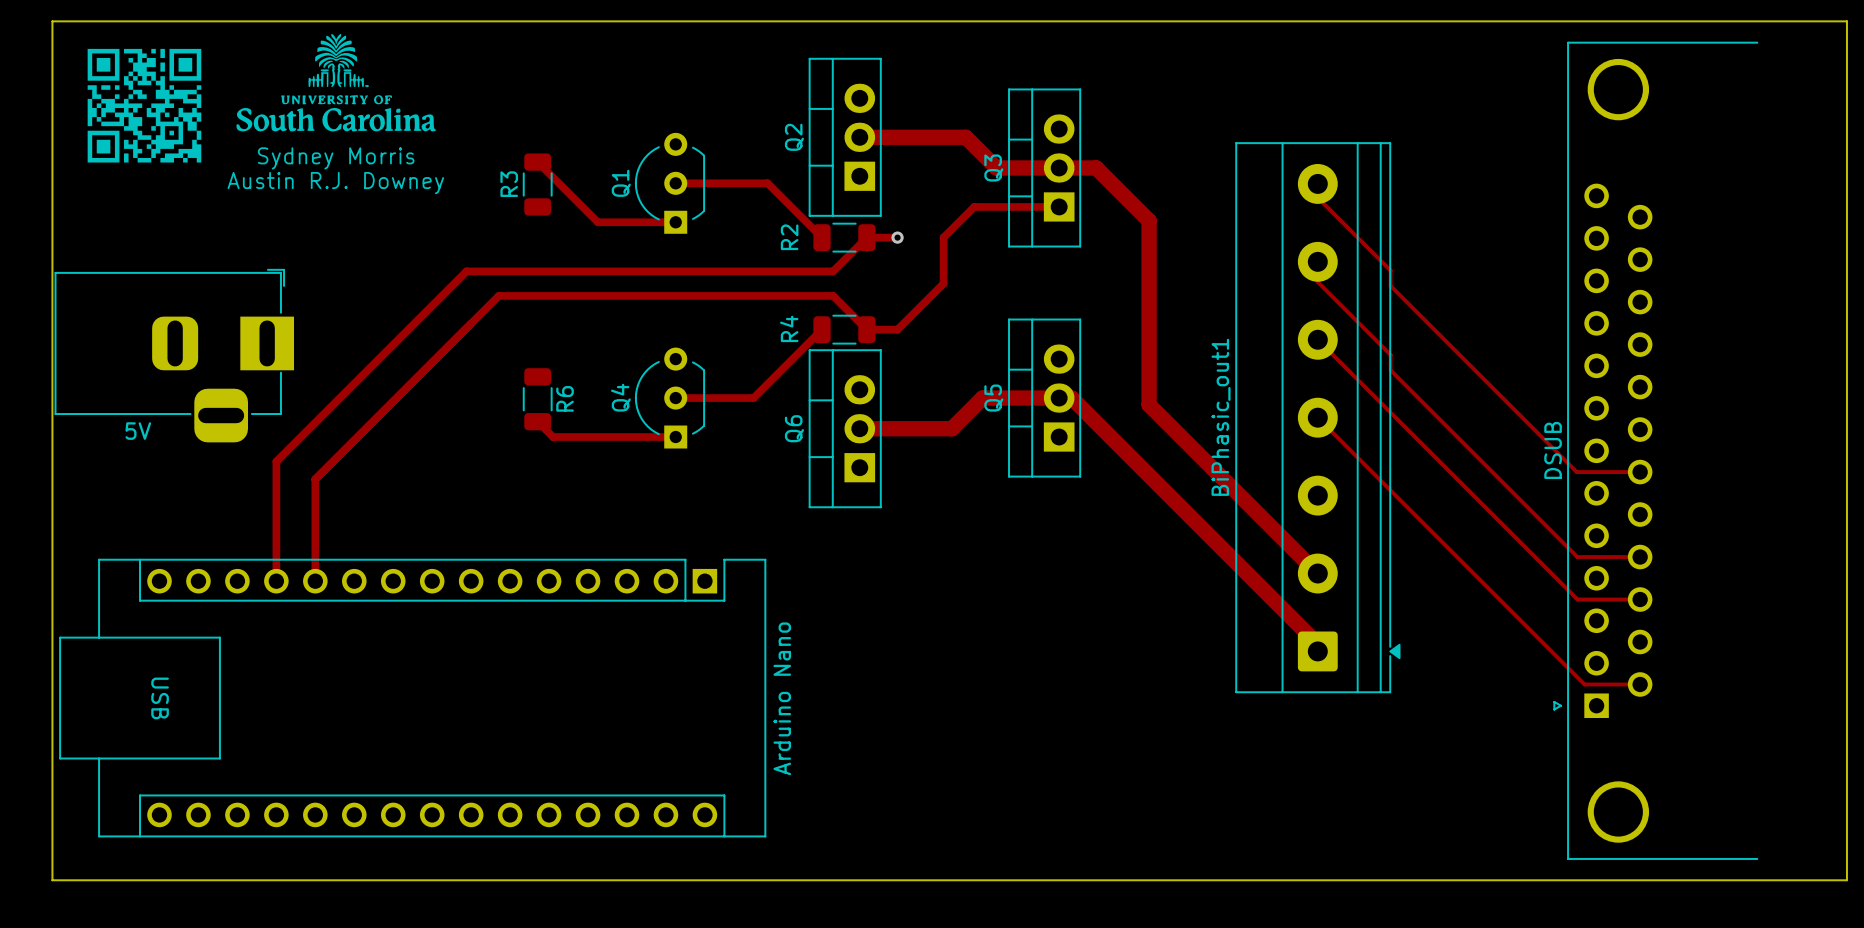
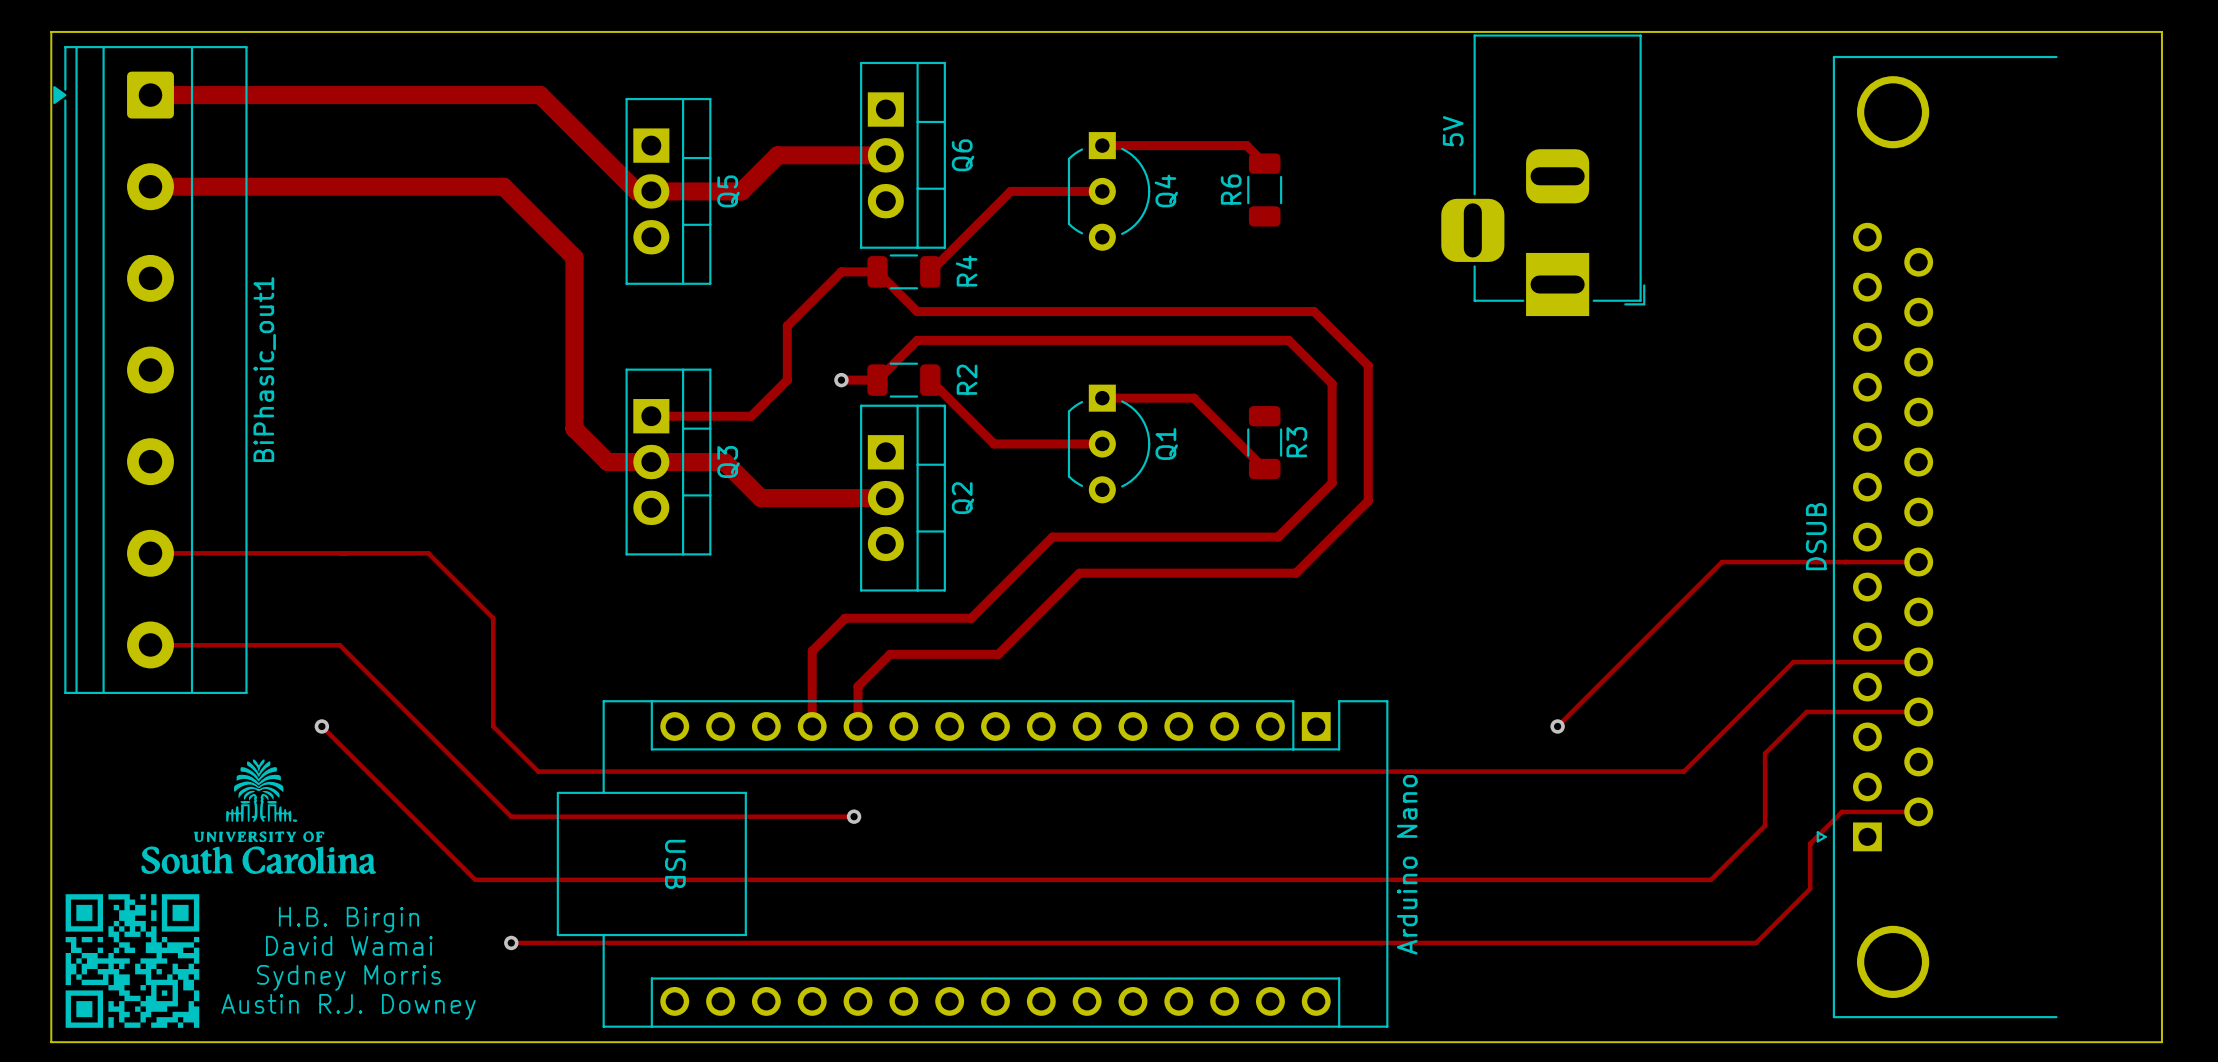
drawing: [236, 33, 436, 132] -> none
drawing: [87, 48, 202, 163] -> none
track: none -> (150, 95) (540, 95) (636, 191) (741, 191) (777, 155) (885, 155)
track: none -> (1102, 145) (1246, 145) (1264, 163)
Q2 rotation: 0° (845, 137) -> 180° (902, 498)
Q2 position: (845, 137) -> (902, 498)
track: (859, 137) (965, 137) (996, 167) (1096, 167) (1149, 220) (1149, 404) (1317, 573) -> none
track: none -> (150, 186) (503, 186) (574, 257) (574, 428) (607, 462) (724, 462) (760, 498) (885, 498)
track: none -> (1102, 191) (1010, 191) (930, 271)
text: Sydney Morris (336, 158) -> none
track: (537, 162) (597, 222) (675, 222) -> none
Q3 rotation: 0° (1044, 167) -> 180° (668, 462)
Q3 position: (1044, 167) -> (668, 462)
text: Austin R.J. Downey (335, 183) -> none
Q1 rotation: 0° (669, 183) -> 180° (1109, 443)
Q1 position: (669, 183) -> (1109, 443)
track: (675, 183) (767, 183) (822, 237) -> none
track: (1317, 183) (1317, 197) (1390, 270) (1390, 285) (1576, 472) -> (1557, 726) (1722, 562) (1844, 562)
R3 name position: R3 (509, 184) -> R3 (1296, 442)
R3 position: (537, 184) -> (1264, 442)
track: (1059, 206) (974, 206) (943, 237) (943, 283) (897, 329) (866, 329) (833, 295) (498, 295) (315, 479) (315, 581) -> none
R2 name position: R2 (789, 237) -> R2 (967, 379)
R2 position: (844, 237) -> (903, 380)
track: (897, 237) (866, 237) (833, 271) (466, 271) (276, 461) (276, 581) -> none
via: (897, 237) -> none
track: (1317, 261) (1317, 282) (1390, 354) (1390, 370) (1577, 557) -> (150, 553) (428, 553) (493, 618) (493, 726) (538, 771) (1683, 771) (1793, 661) (1844, 661)
track: none -> (841, 380) (877, 380) (917, 340) (1288, 340) (1332, 383) (1332, 482) (1278, 537) (1052, 537) (971, 618) (845, 618) (812, 651) (812, 726)
via: none -> (841, 380)
track: none -> (930, 380) (994, 443) (1102, 443)
R4 name position: R4 (789, 328) -> R4 (966, 271)
track: (822, 329) (753, 398) (675, 398) -> none
R4 position: (844, 329) -> (903, 271)
track: none -> (1102, 398) (1193, 398) (1264, 468)
track: (1317, 339) (1577, 599) -> (321, 726) (475, 879) (1710, 879) (1765, 825) (1765, 753) (1806, 711) (1845, 711)
track: none -> (651, 416) (751, 416) (787, 380) (787, 325) (841, 271) (877, 271) (917, 311) (1314, 311) (1368, 365) (1368, 500) (1296, 573) (1079, 573) (998, 654) (890, 654) (858, 686) (858, 726)
5V rotation: 0° (174, 355) -> 90° clockwise (1543, 175)
5V position: (174, 355) -> (1543, 175)
R6 name position: R6 (565, 398) -> R6 (1231, 189)
Q4 rotation: 0° (669, 398) -> 180° (1109, 191)
Q4 position: (669, 398) -> (1109, 191)
Q5 rotation: 0° (1044, 398) -> 180° (668, 191)
Q5 position: (1044, 398) -> (668, 191)
R6 position: (537, 399) -> (1264, 190)
track: (1317, 417) (1584, 684) -> (511, 942) (1756, 942) (1810, 888) (1810, 843) (1842, 811) (1853, 811)
BiPhasic_out1 rotation: 0° (1317, 417) -> 180° (150, 370)
BiPhasic_out1 position: (1317, 417) -> (150, 370)
track: (537, 421) (553, 437) (675, 437) -> none
Q6 rotation: 0° (845, 428) -> 180° (902, 155)
Q6 position: (845, 428) -> (902, 155)
track: (859, 428) (951, 428) (982, 398) (1071, 398) (1317, 644) (1317, 651) -> none
track: none -> (150, 644) (339, 645) (511, 816) (854, 816)
via: none -> (321, 726)
via: none -> (1557, 726)
drawing: none -> [65, 759, 376, 1028]
via: none -> (854, 816)
Arduino Nano: (412, 698) -> none
Arduino Nano: none -> (972, 863)
text: none -> H.B. Birgin (348, 919)
via: none -> (511, 942)
text: none -> David Wamai (349, 945)
text: none -> Sydney Morris (348, 977)
text: none -> Austin R.J. Downey (348, 1006)

